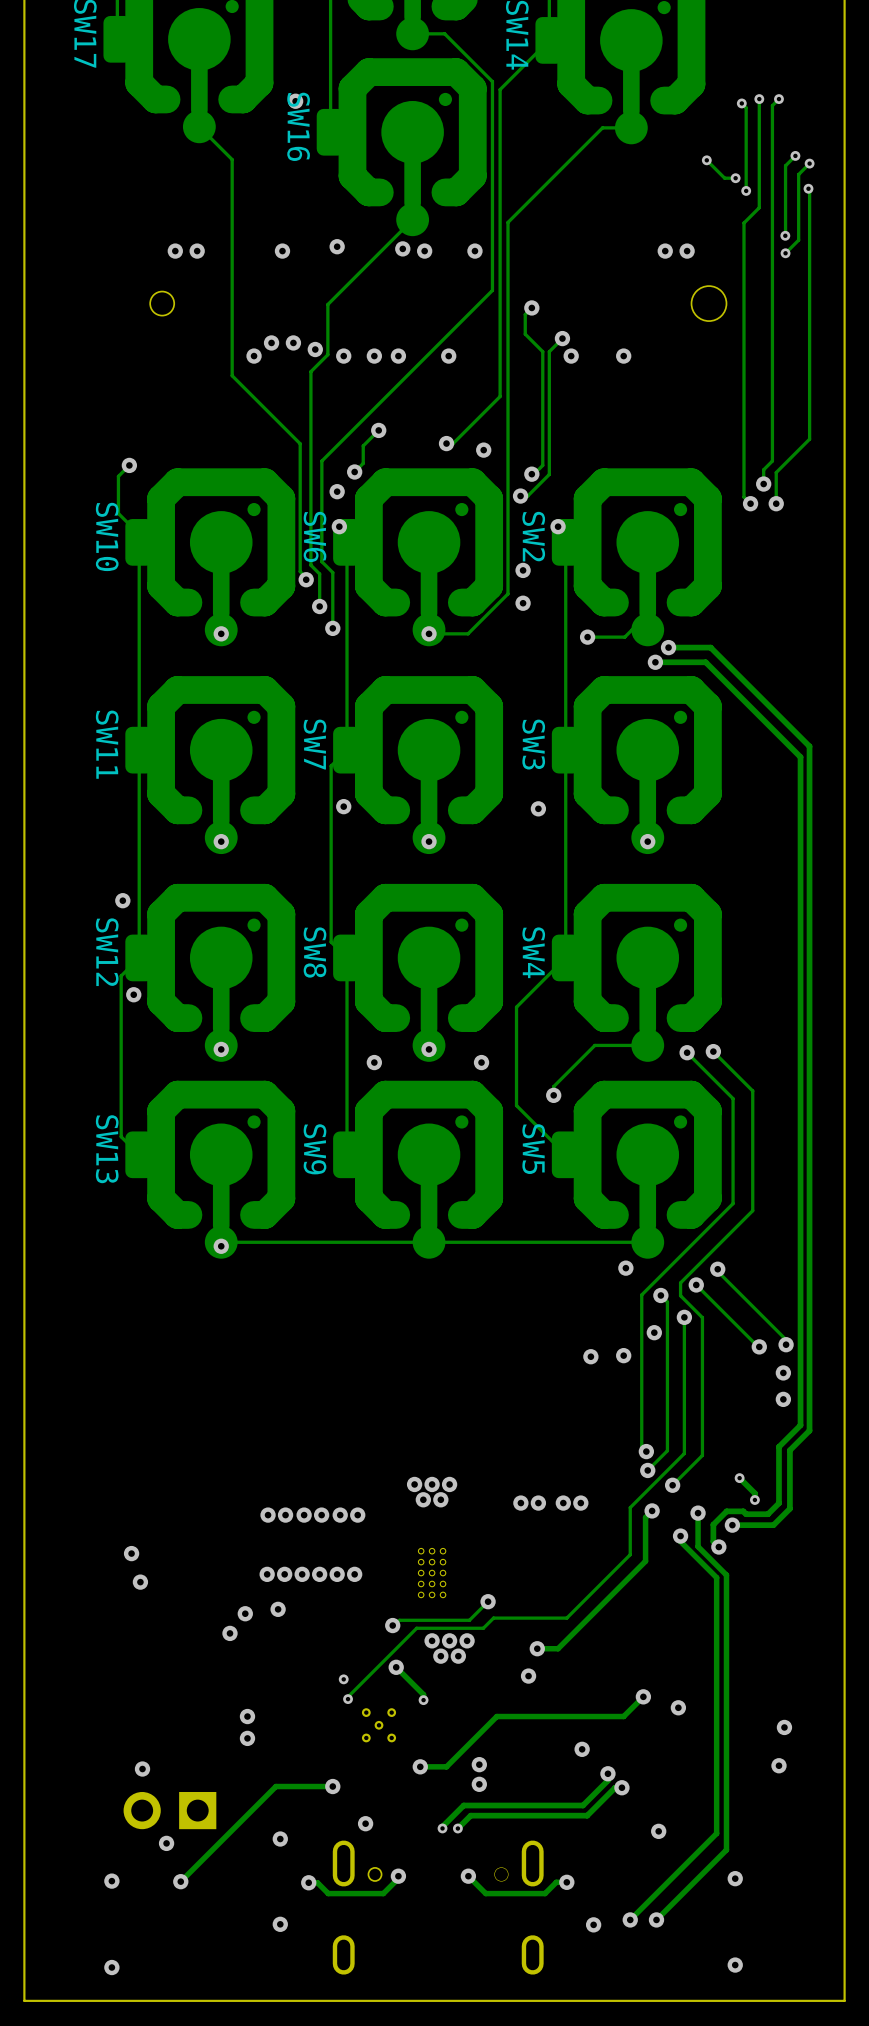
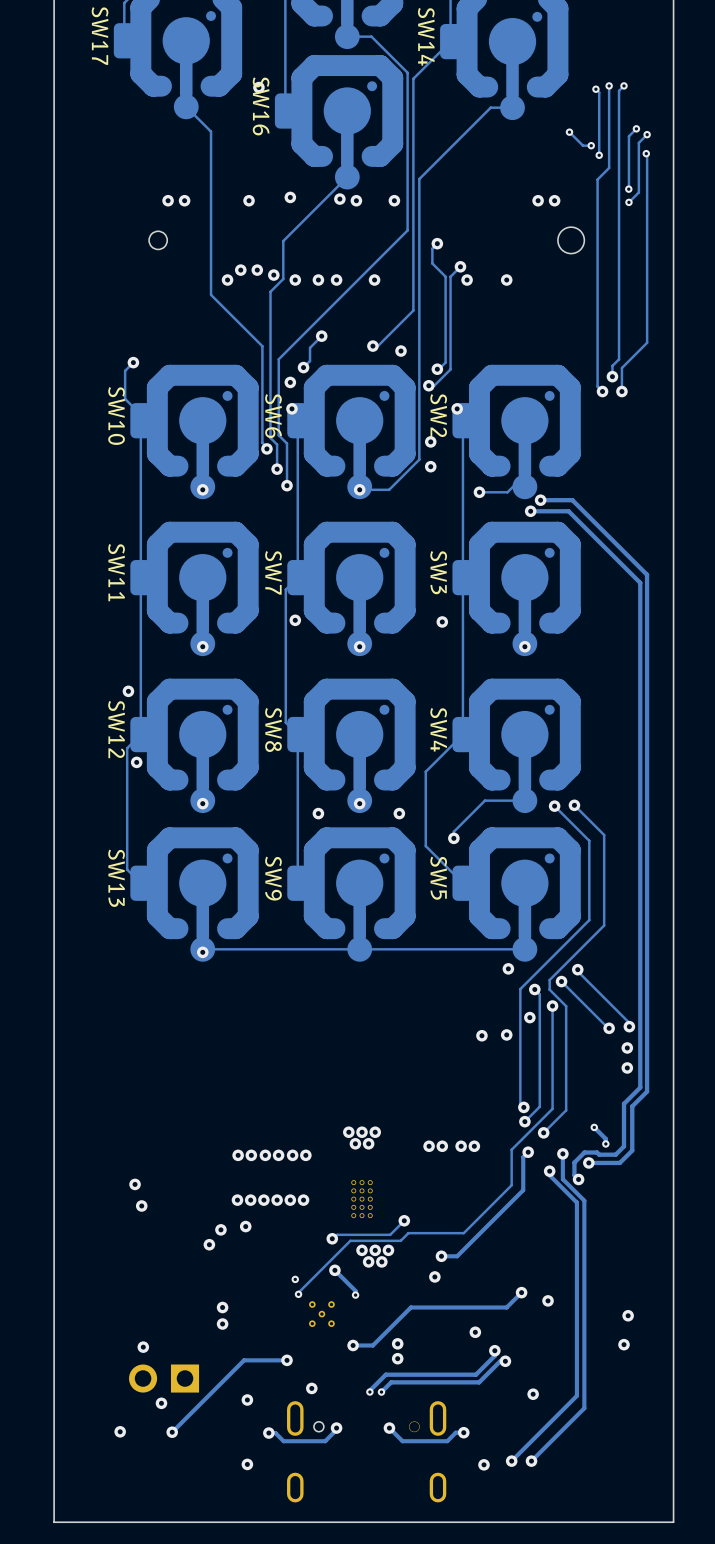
via: (735, 1878) -> none
via: (735, 1965) -> none
via: (111, 1967) -> none

